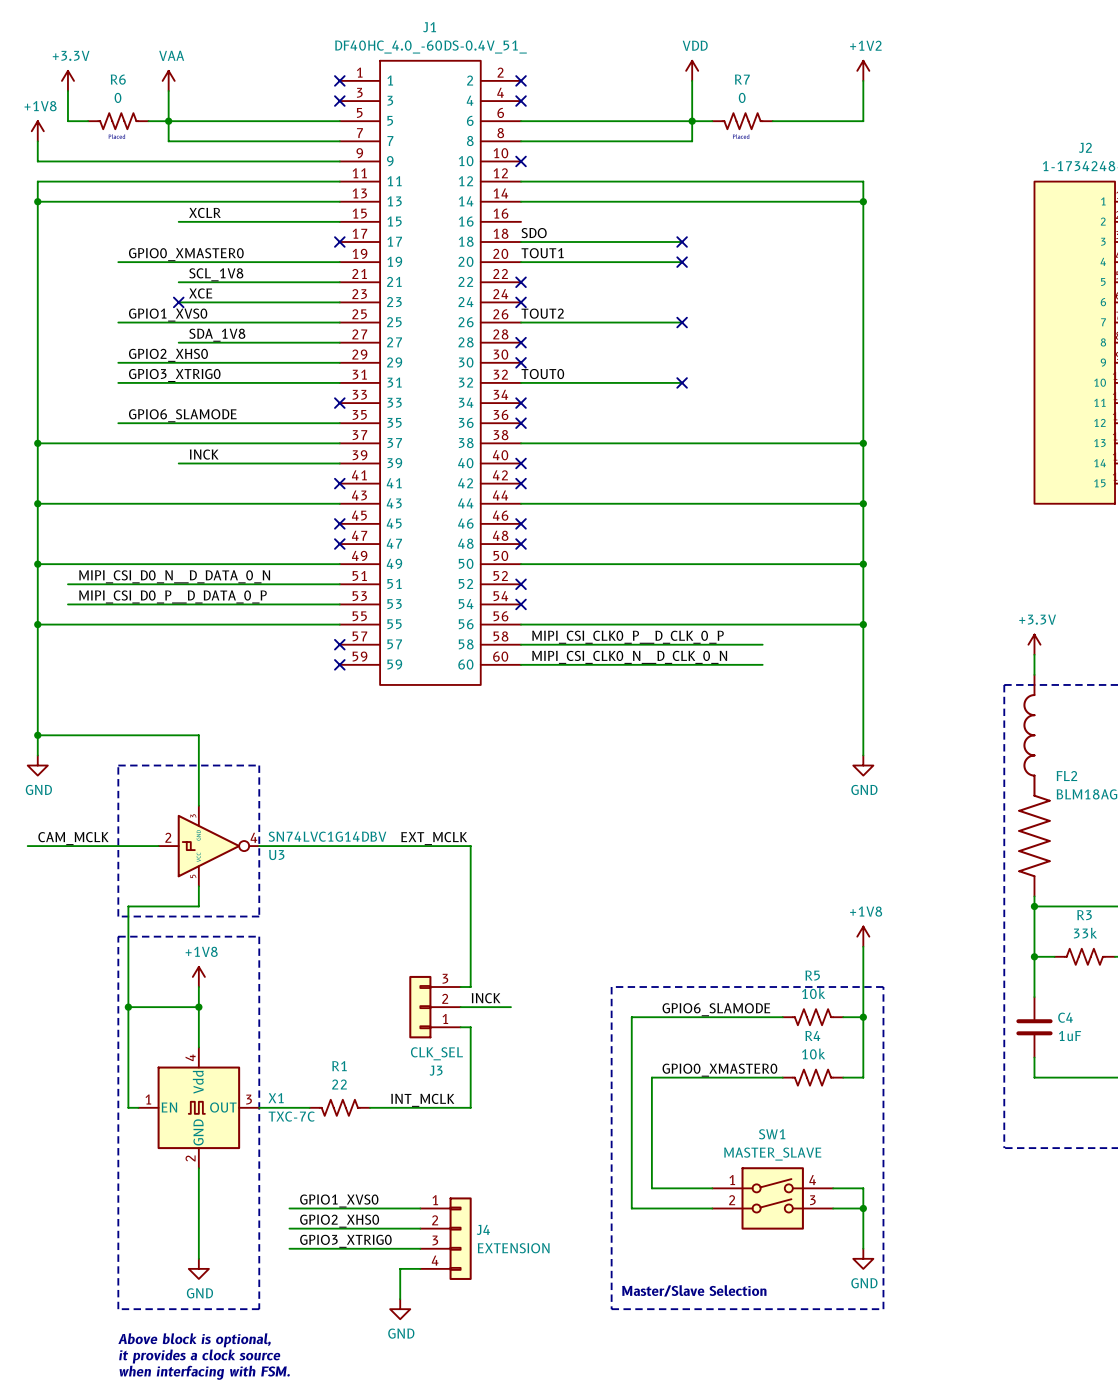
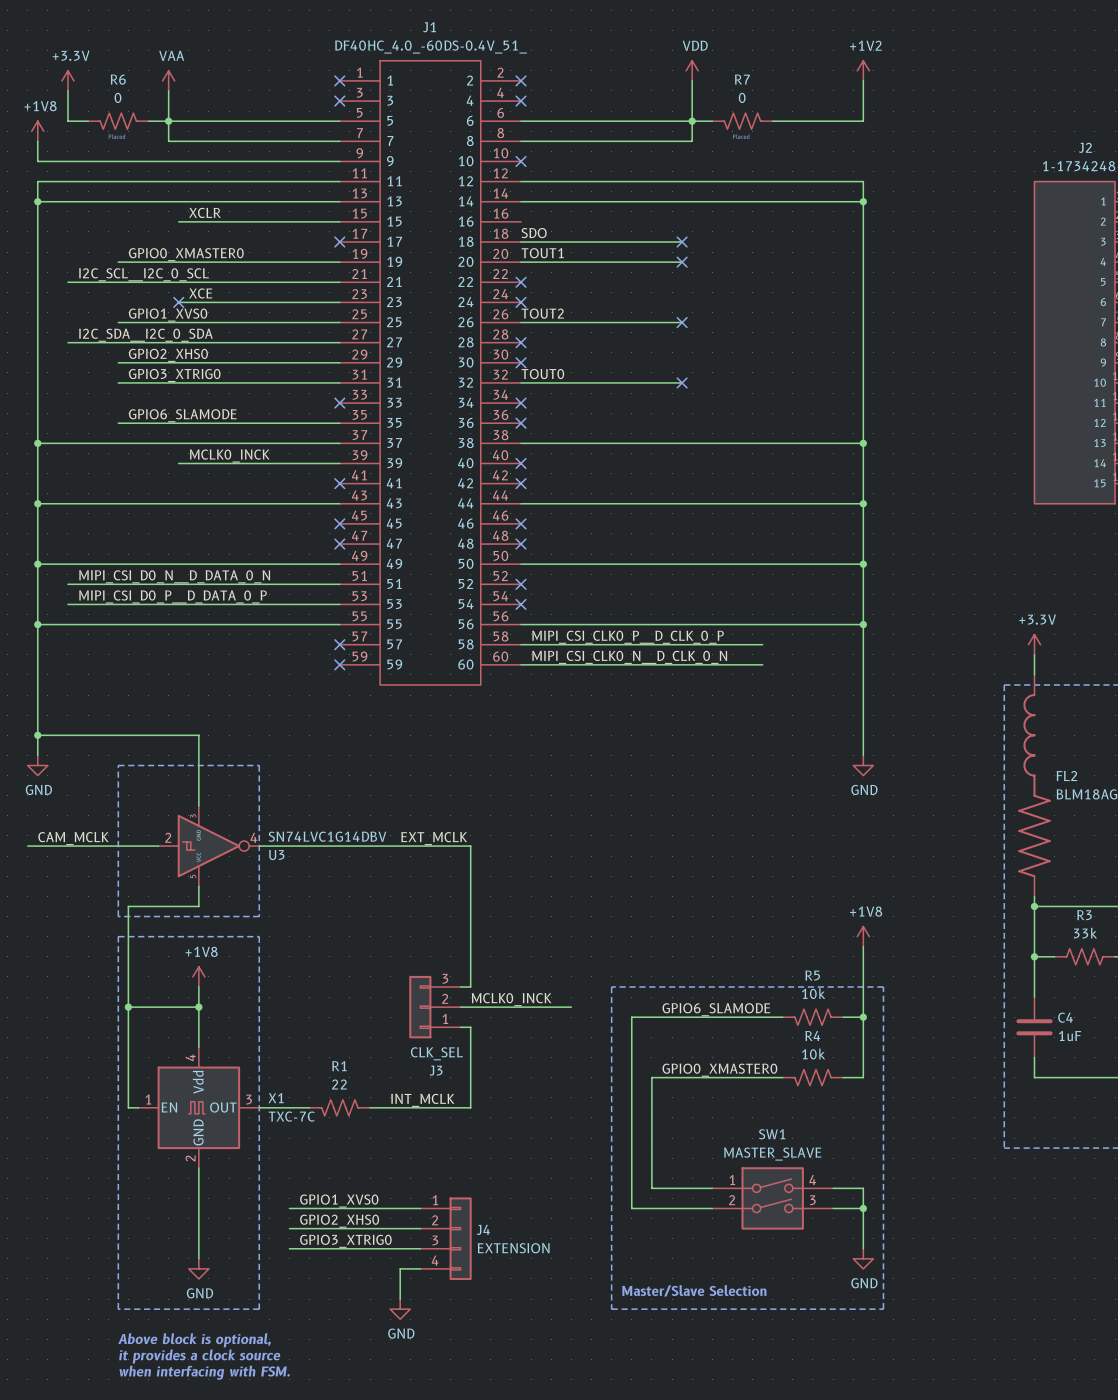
label: none -> I2C_SCL__I2C_0_SCL (143, 274)
label: SCL_1V8 (216, 274) -> none
wire: none -> (67, 282) (178, 282)
label: none -> I2C_SDA__I2C_0_SDA (145, 335)
label: SDA_1V8 (217, 335) -> none
wire: none -> (67, 342) (178, 342)
label: INCK (204, 454) -> MCLK0_INCK (229, 456)
label: INCK (486, 998) -> MCLK0_INCK (511, 999)
wire: none -> (510, 1007) (571, 1007)

